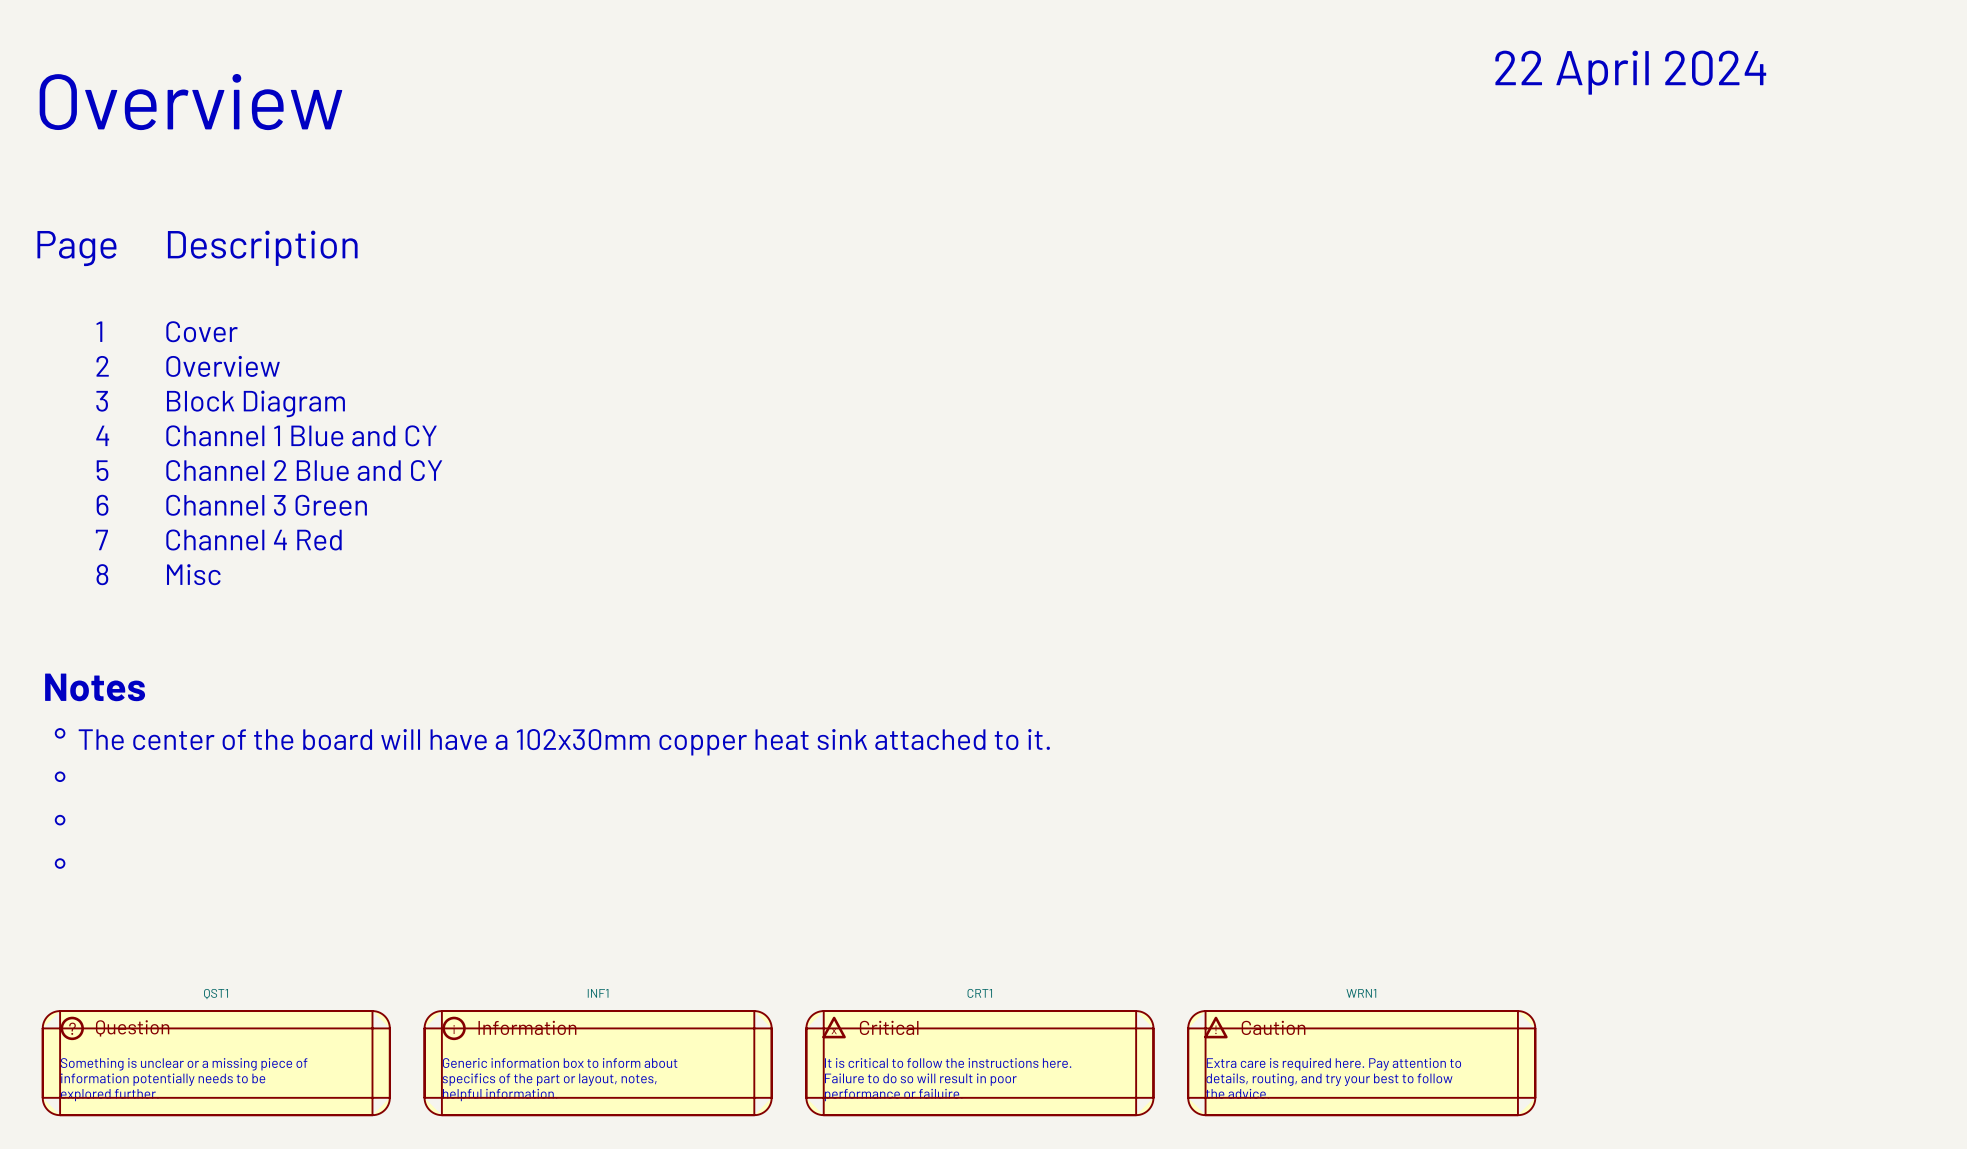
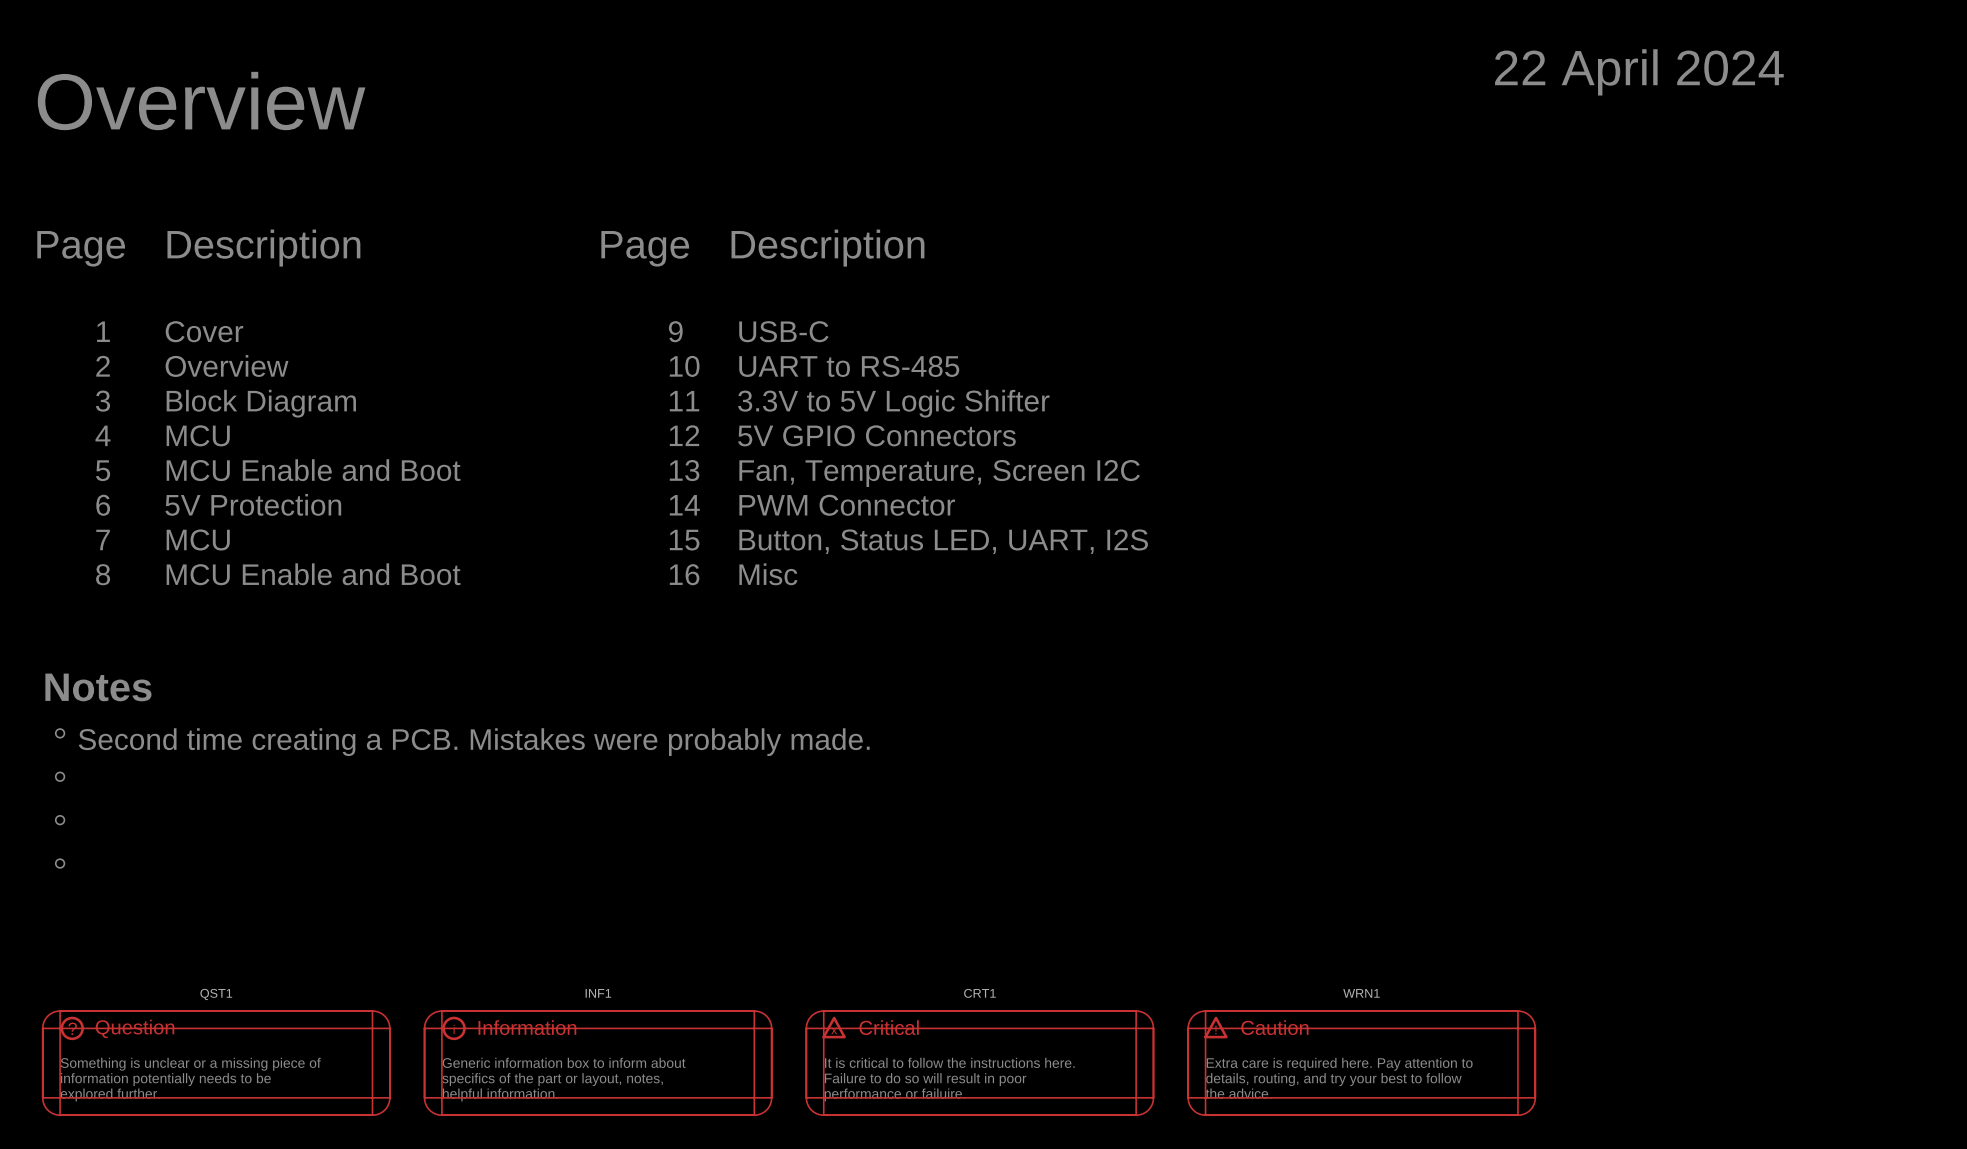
text: none -> Page (645, 248)
text: none -> Description (827, 248)
text: none -> 9 (675, 331)
text: none -> USB-C (783, 331)
text: none -> 10 (684, 366)
text: none -> UART to RS-485 (849, 366)
text: none -> 11 (684, 401)
text: none -> 3.3V to 5V Logic Shifter (893, 403)
text: Channel 1 Blue and CY (301, 435) -> MCU (198, 435)
text: none -> 12 (684, 435)
text: none -> 5V GPIO Connectors (876, 435)
text: Channel 2 Blue and CY (304, 470) -> MCU Enable and Boot (313, 470)
text: none -> 13 (684, 470)
text: none -> Fan, Temperature, Screen I2C (939, 473)
text: Channel 3 Green (266, 505) -> 5V Protection (253, 504)
text: none -> 14 (684, 505)
text: none -> PWM Connector (847, 505)
text: Channel 4 Red (253, 539) -> MCU (198, 539)
text: none -> 15 (684, 540)
text: none -> Button, Status LED, UART, I2S (943, 541)
text: Misc (193, 574) -> MCU Enable and Boot (313, 574)
text: none -> 16 (684, 574)
text: none -> Misc (768, 574)
text: The center of the board will have a 102x30mm copper heat sink attached to it. (564, 742) -> Second time creating a PCB. Mistakes were probably made. (474, 742)

